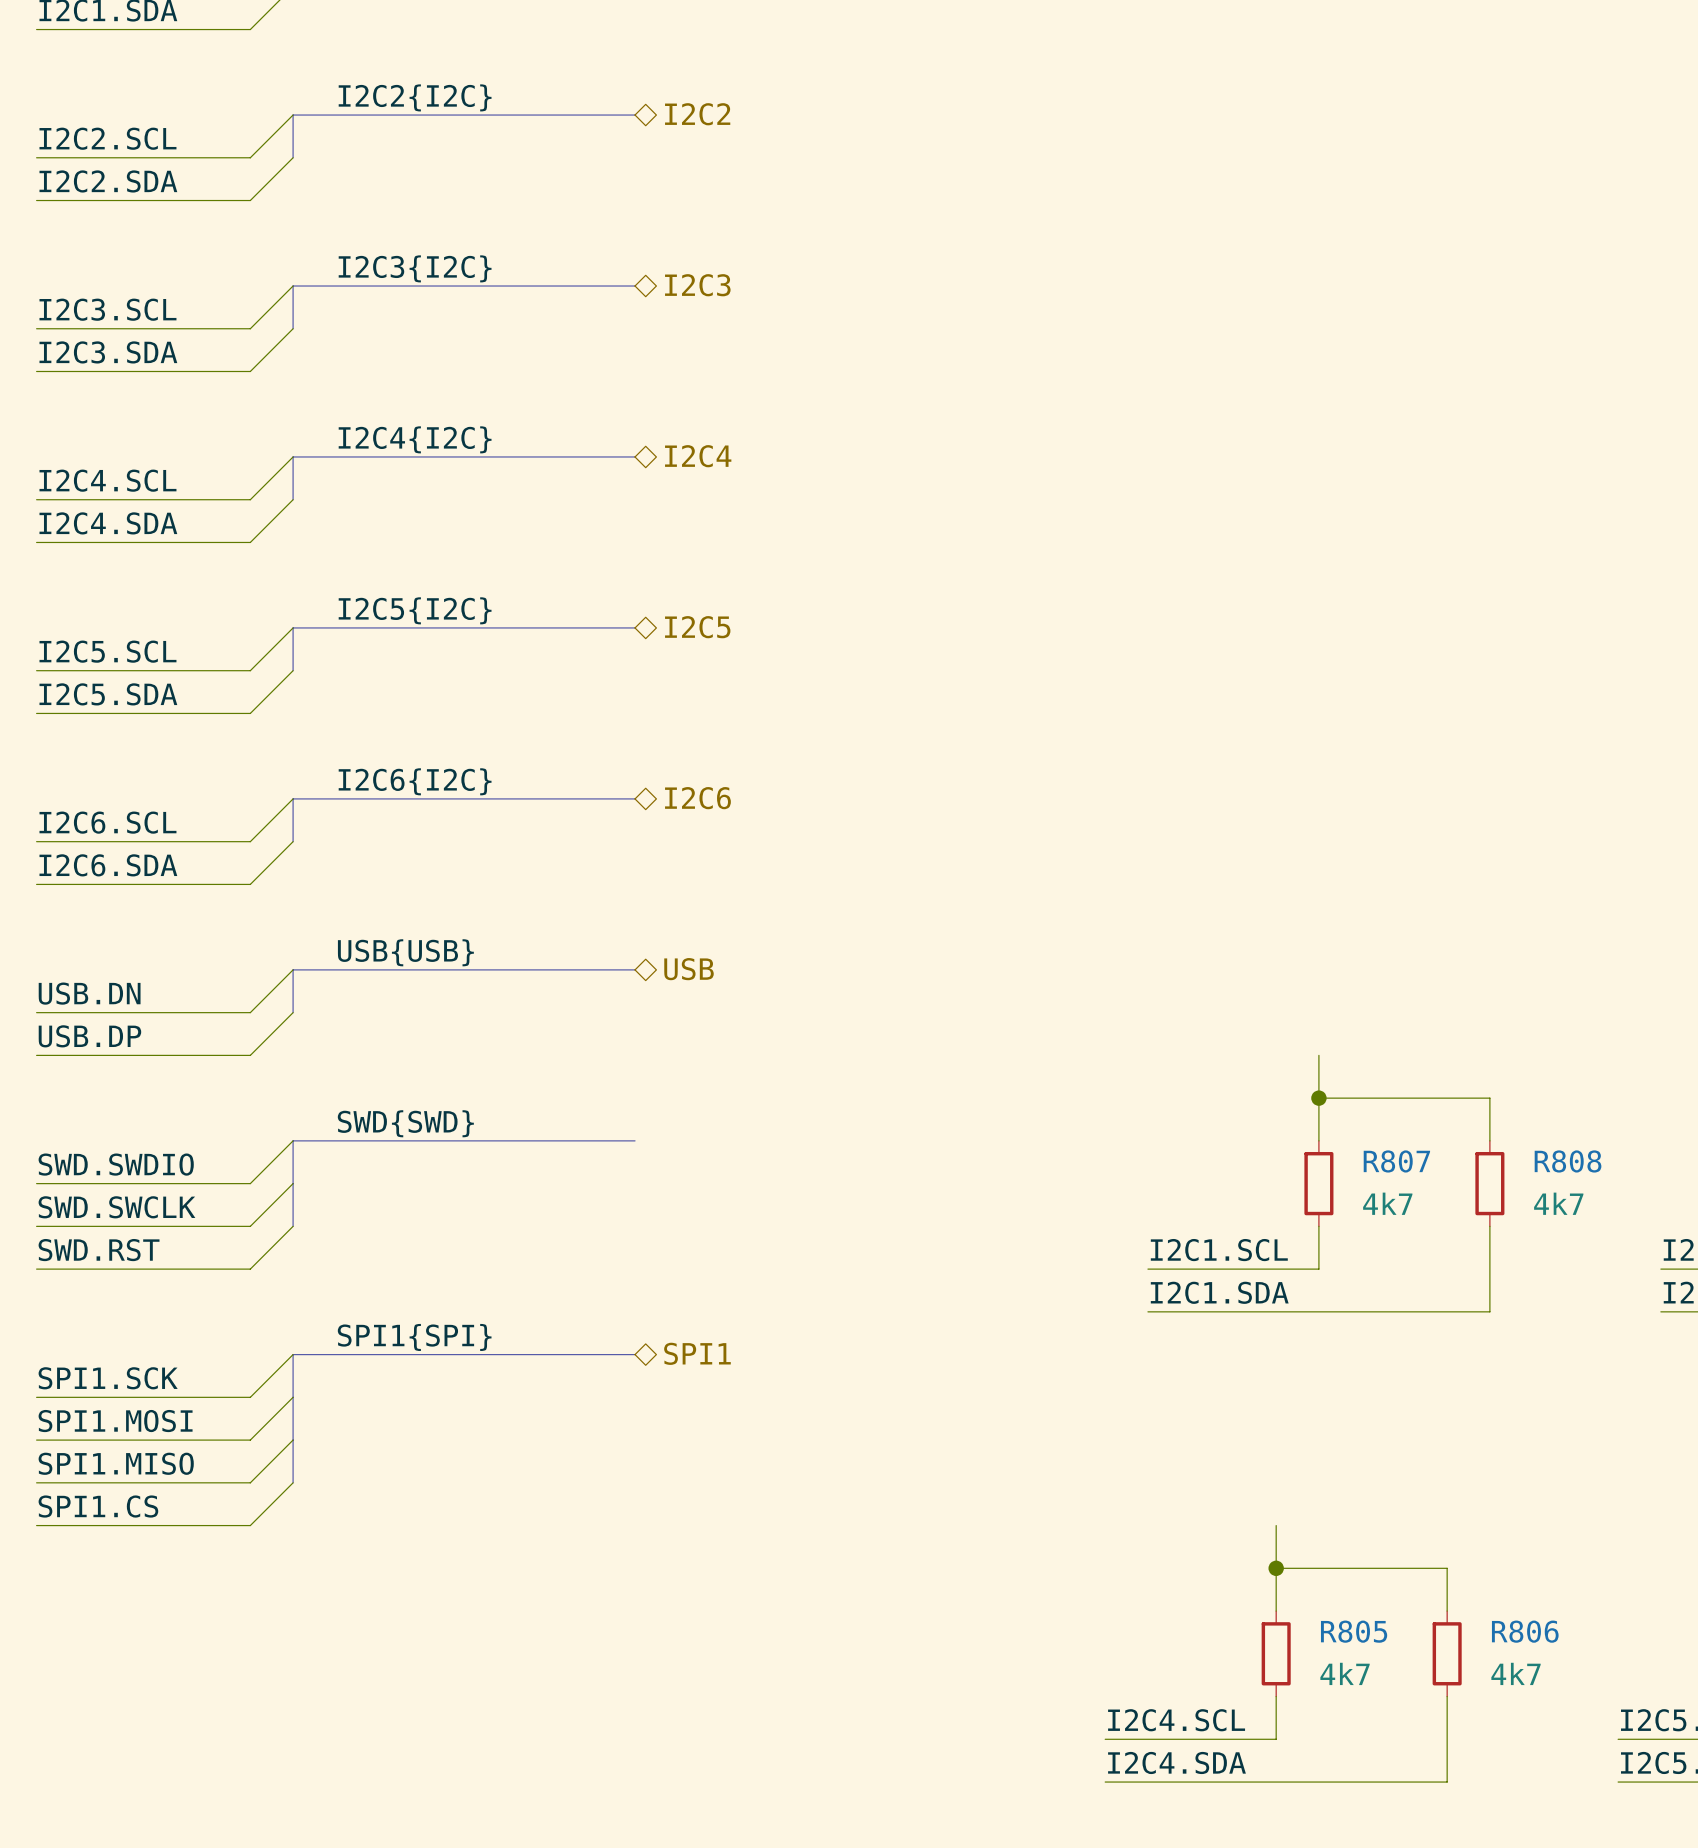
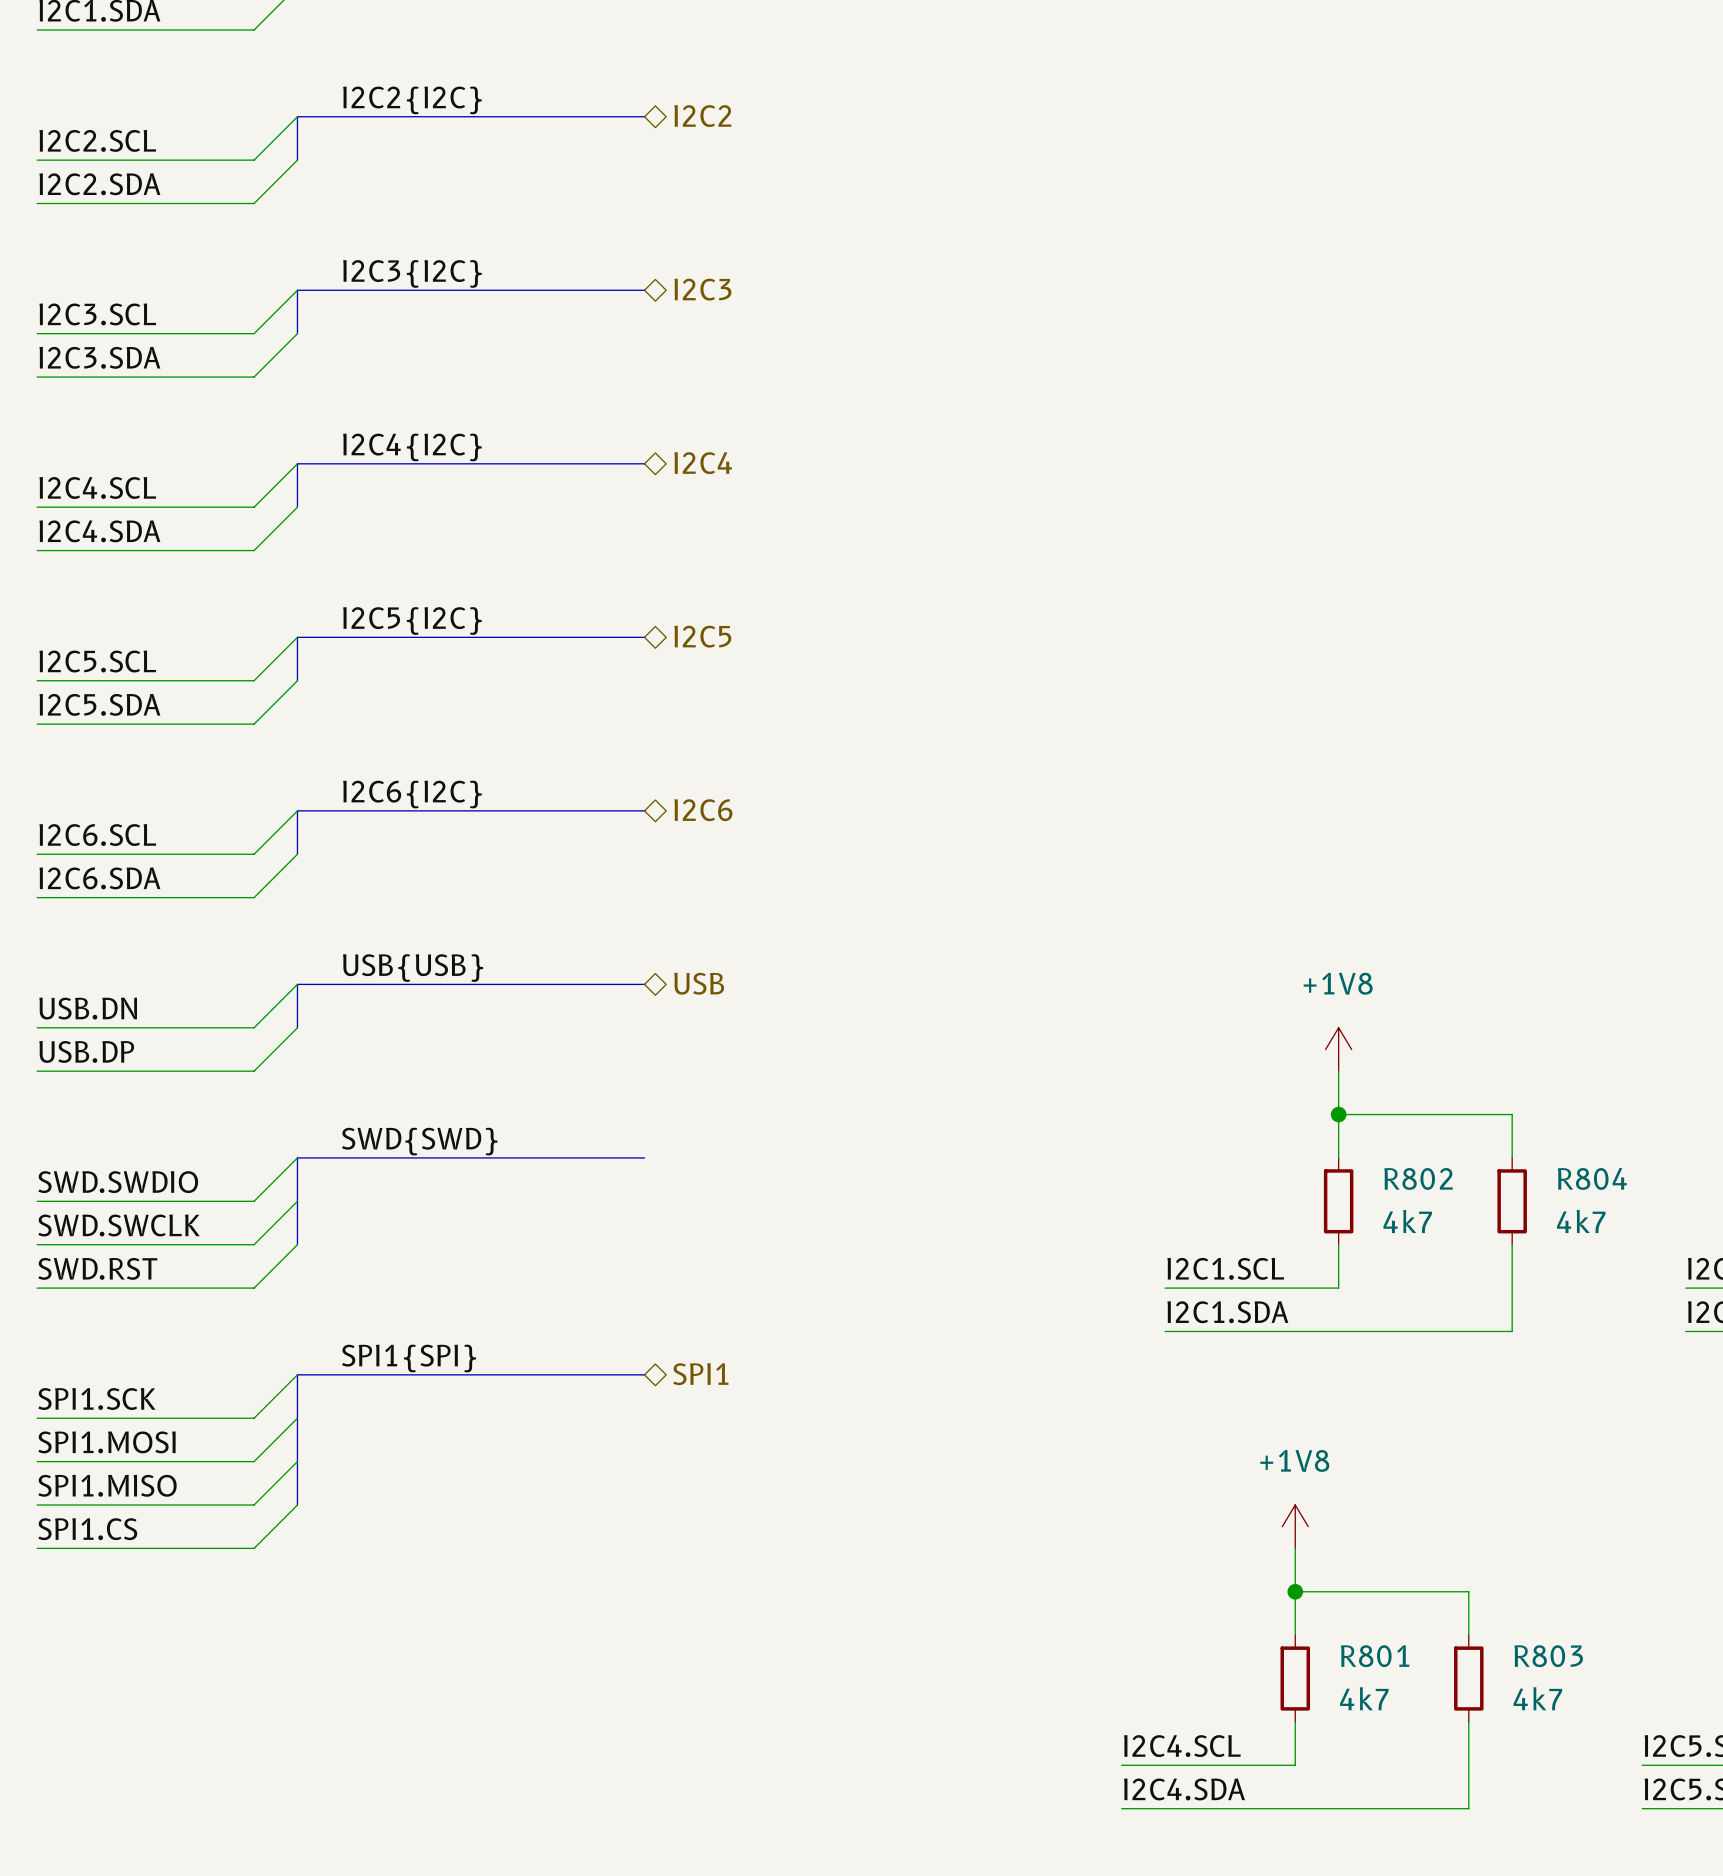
power symbol: none -> +1V8 (1338, 1049)
R807 name: R807 (1396, 1161) -> R802 (1418, 1178)
R808 name: R808 (1568, 1161) -> R804 (1592, 1178)
power symbol: none -> +1V8 (1295, 1526)
R805 name: R805 (1354, 1631) -> R801 (1375, 1656)
R806 name: R806 (1525, 1631) -> R803 (1548, 1656)

